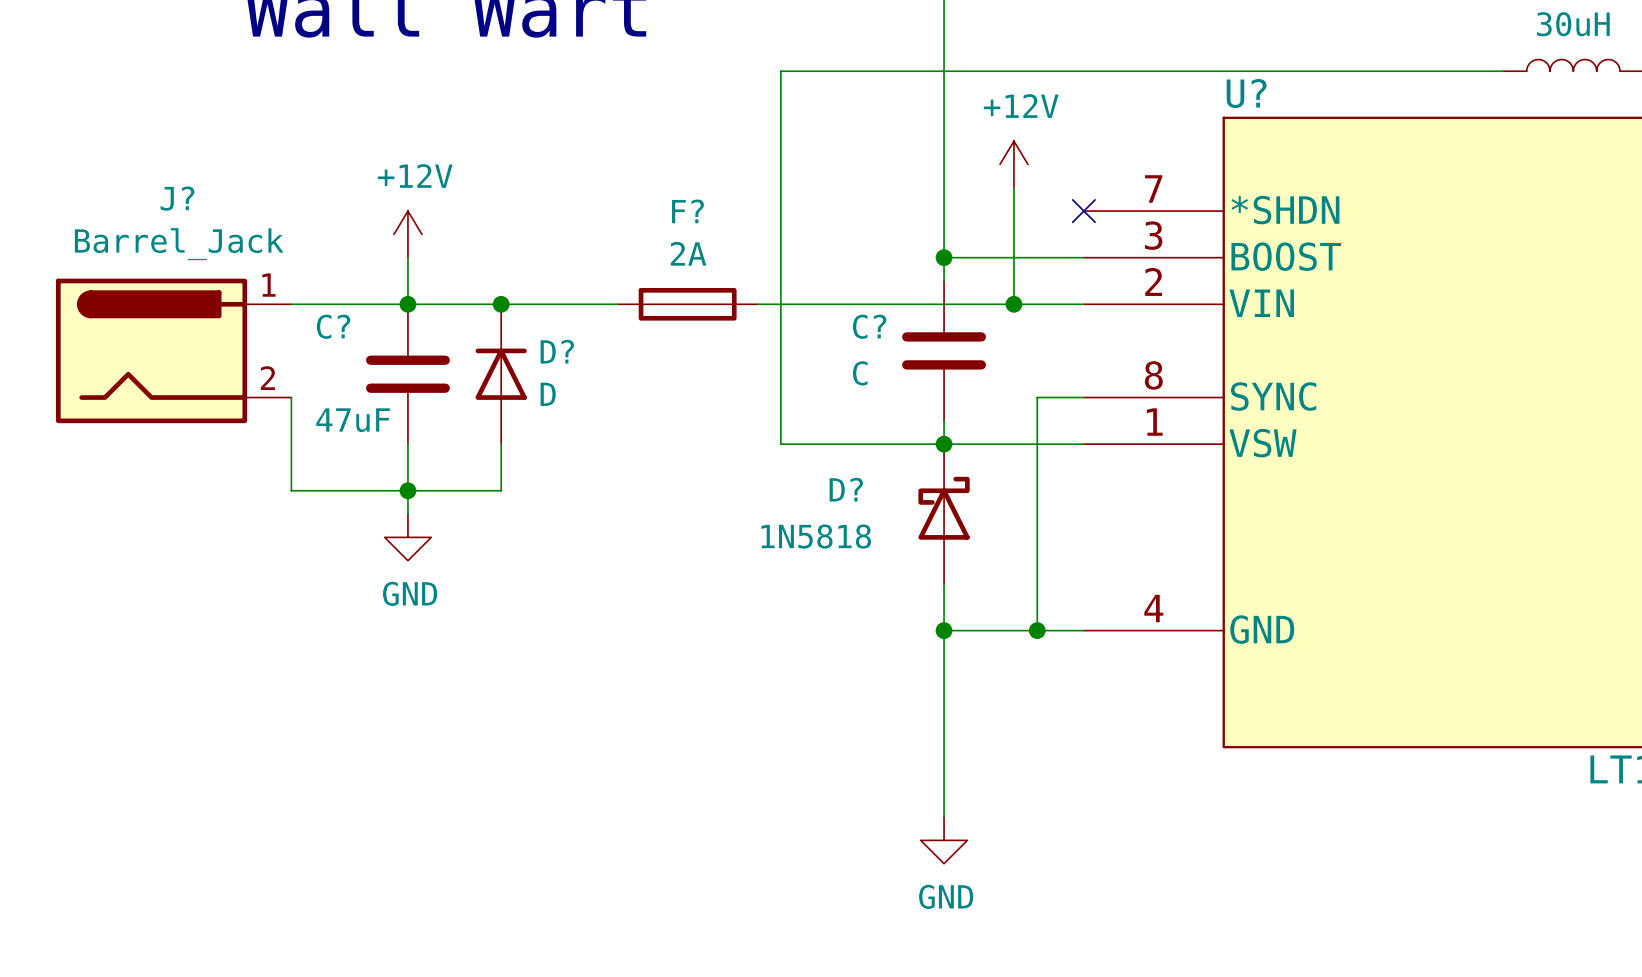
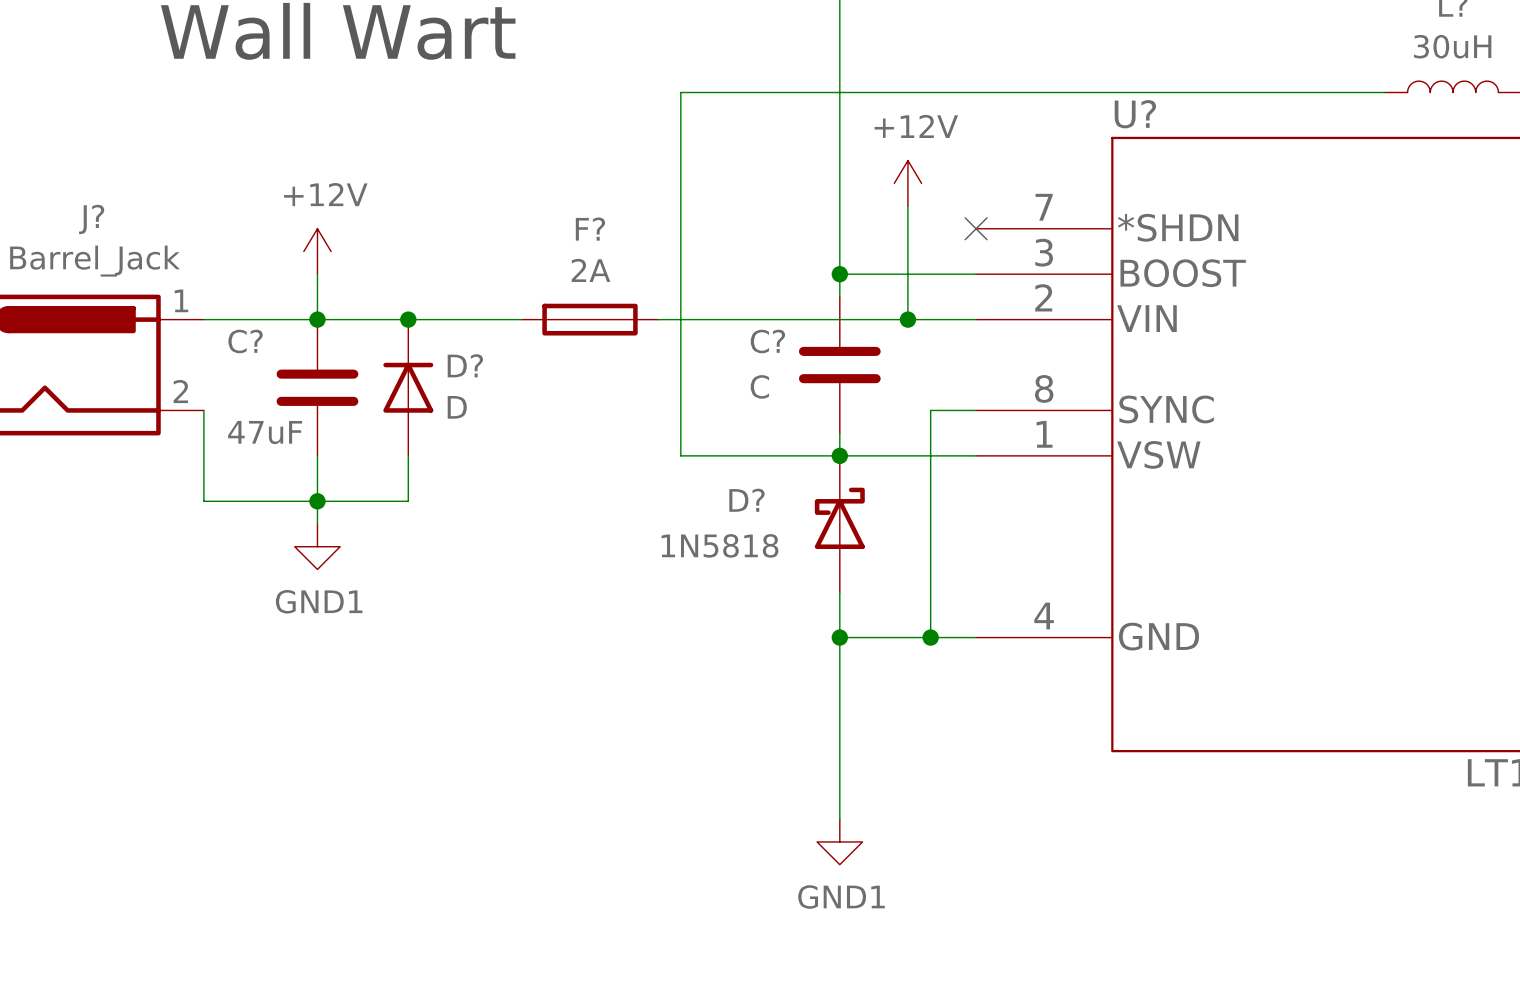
power symbol: GND (407, 537) -> GND1 (317, 546)
power symbol: GND (944, 840) -> GND1 (839, 841)

